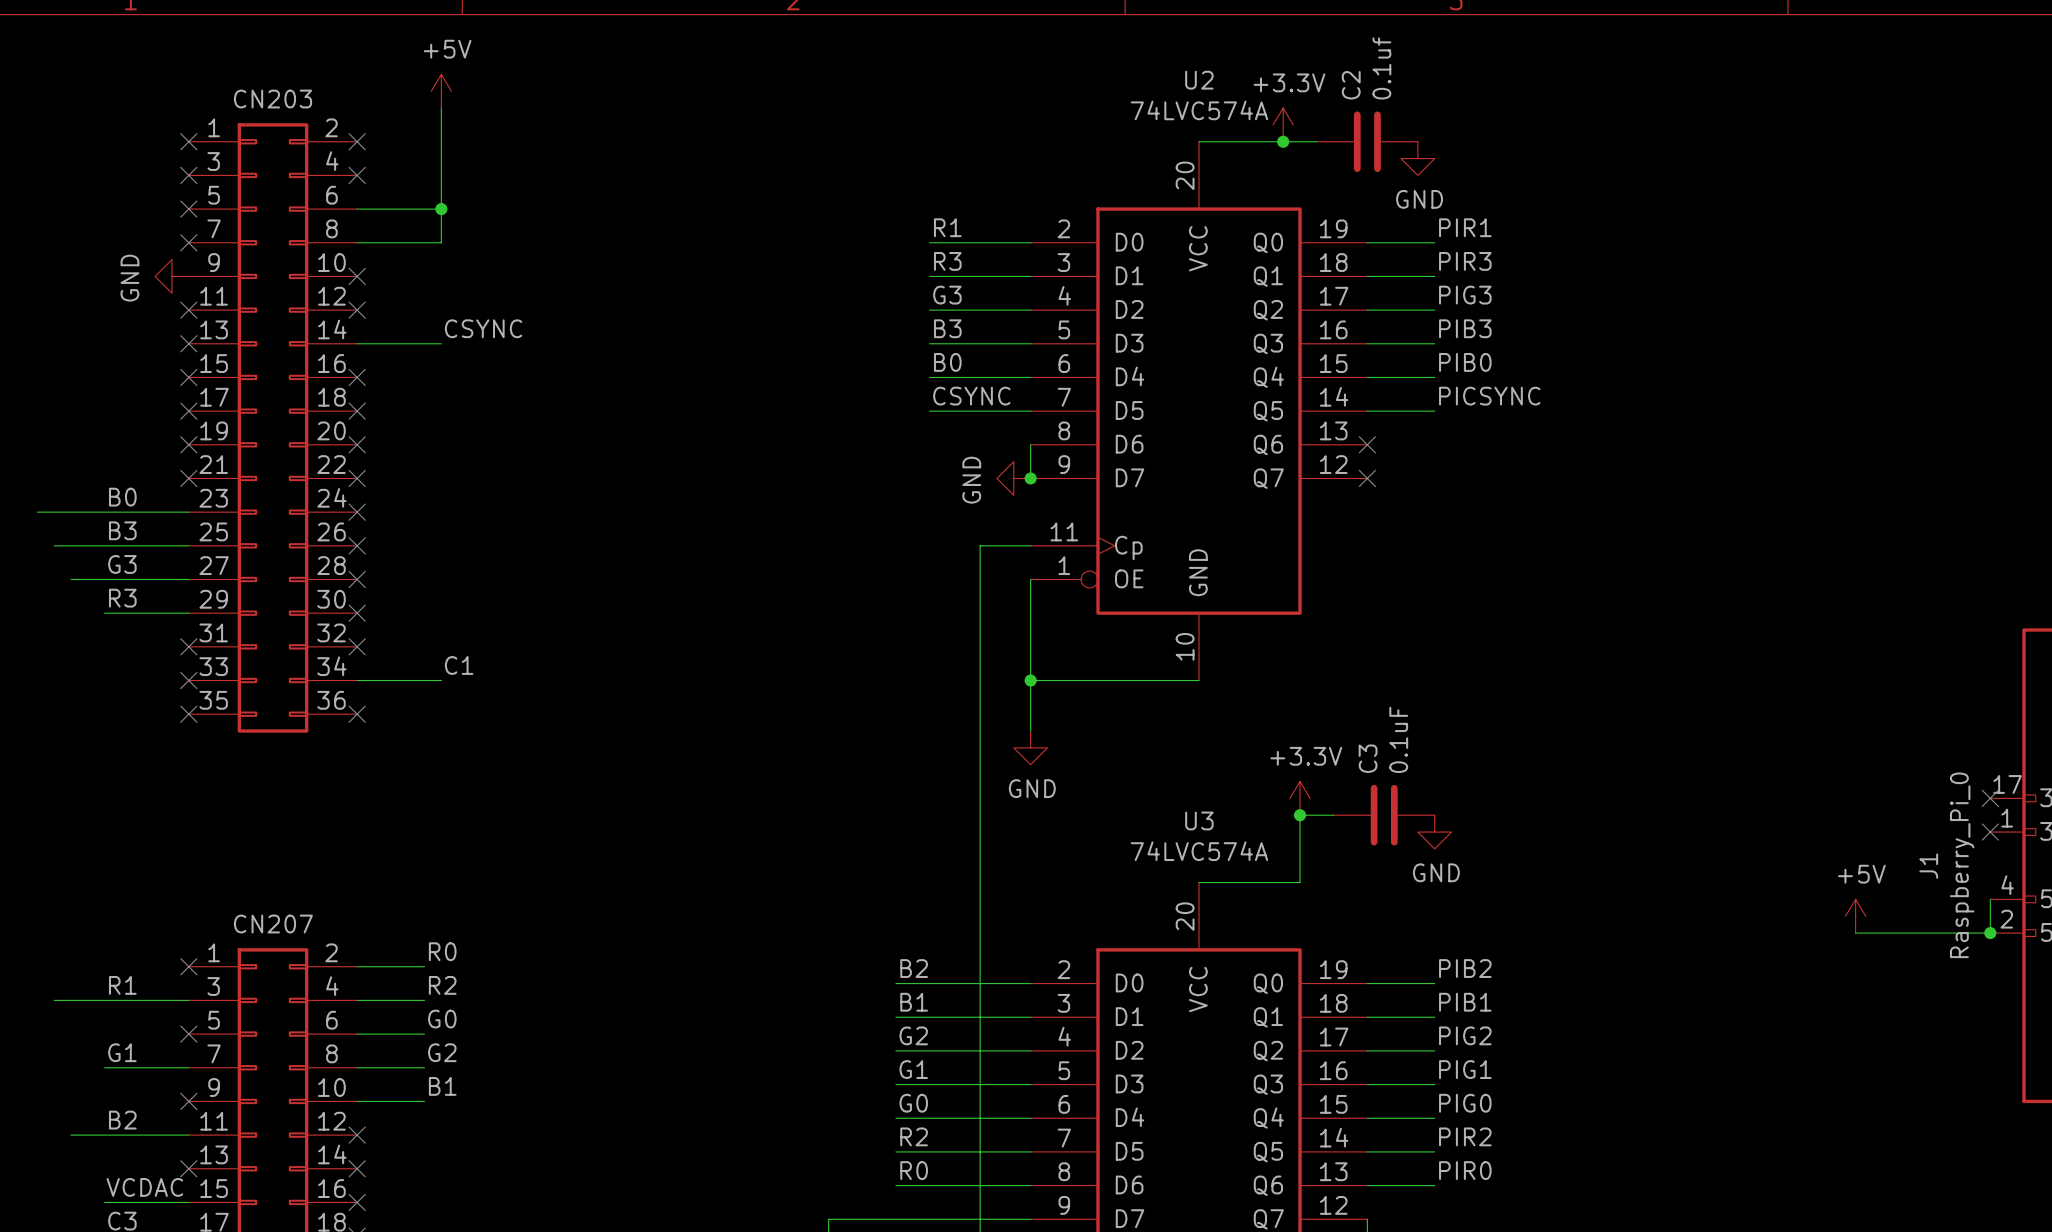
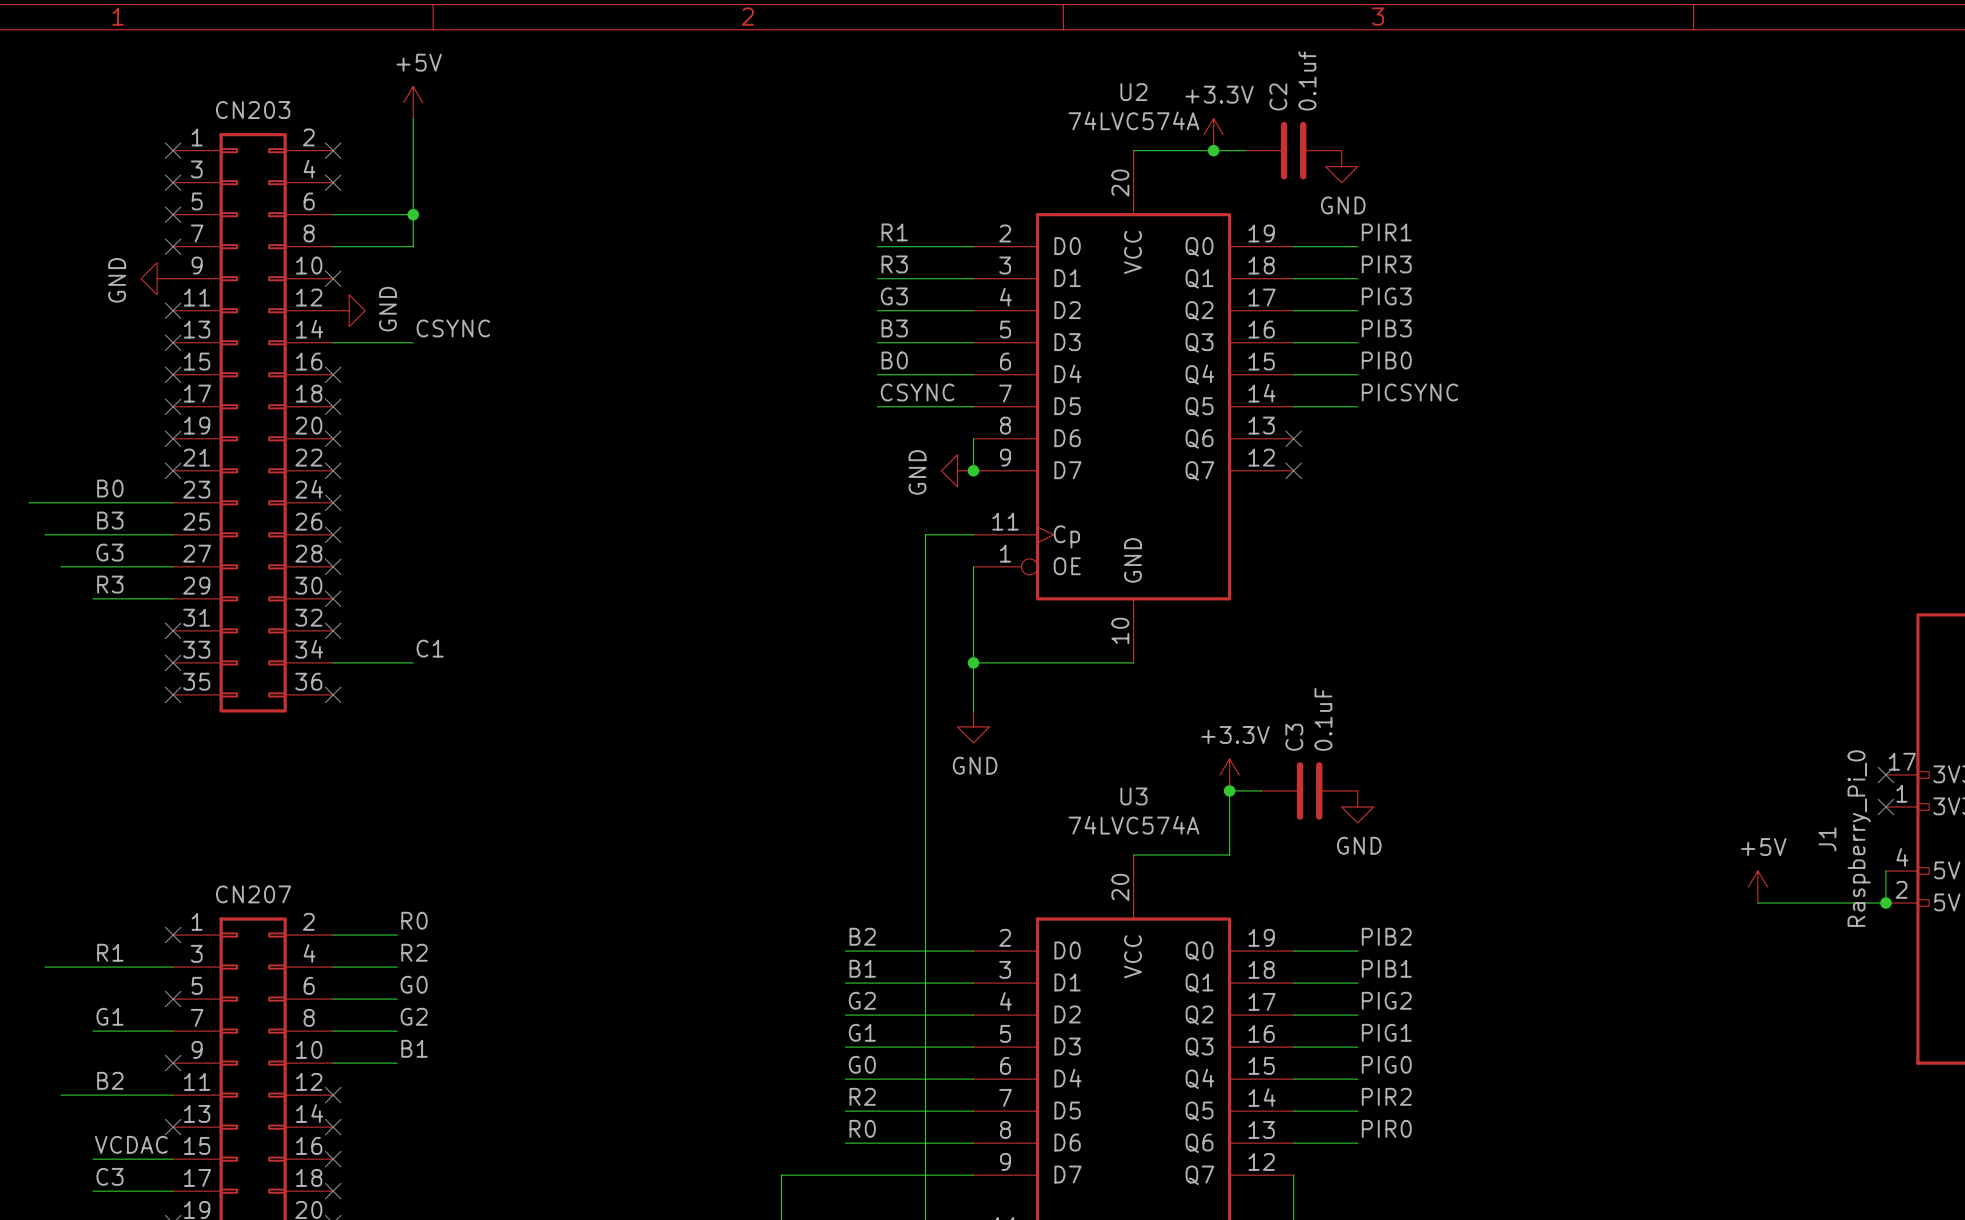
no-connect mark: (357, 310) -> none
power symbol: none -> GND (349, 310)

